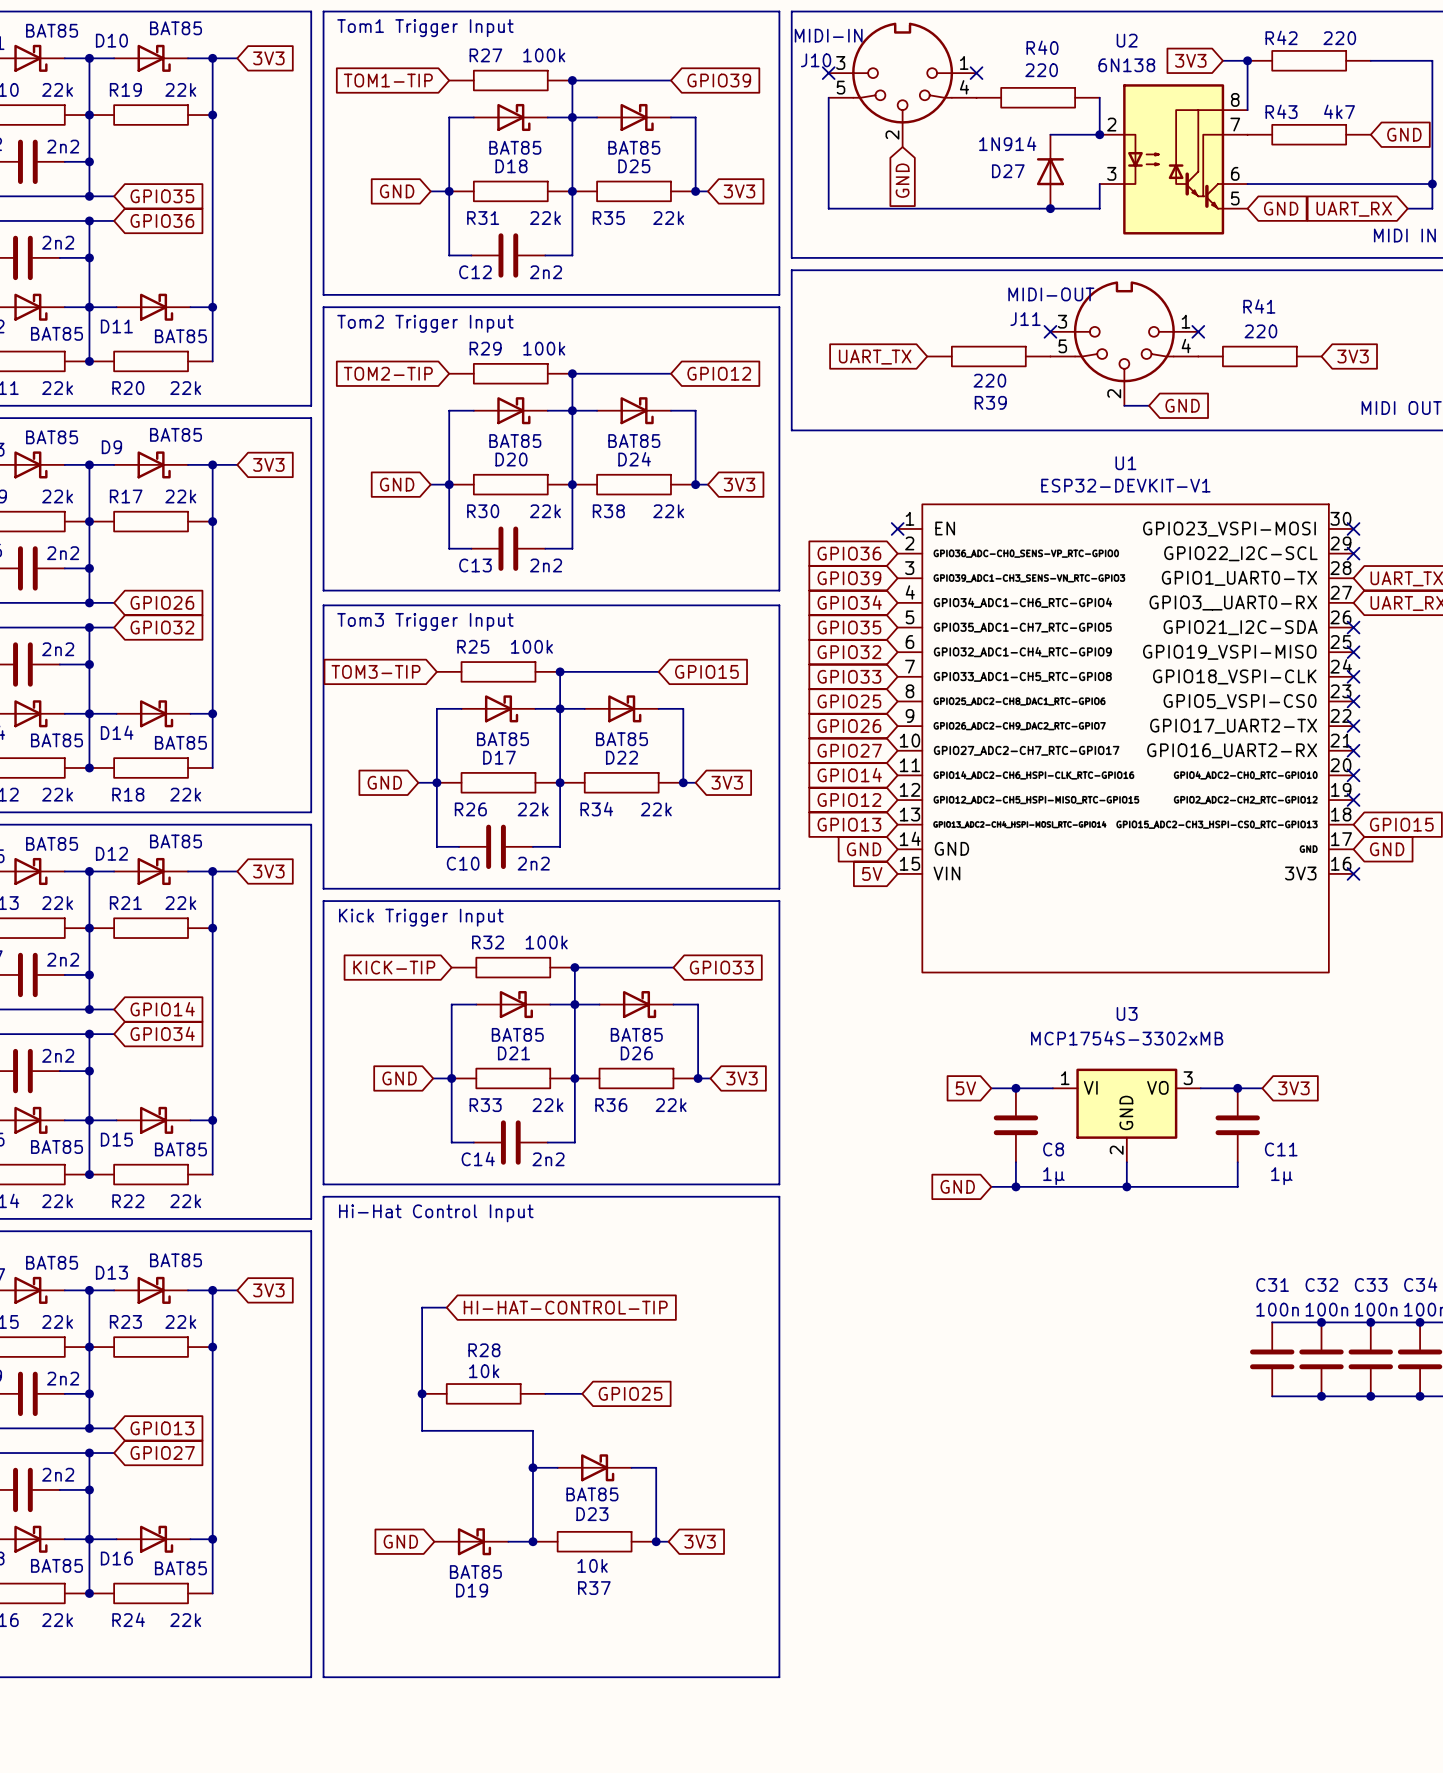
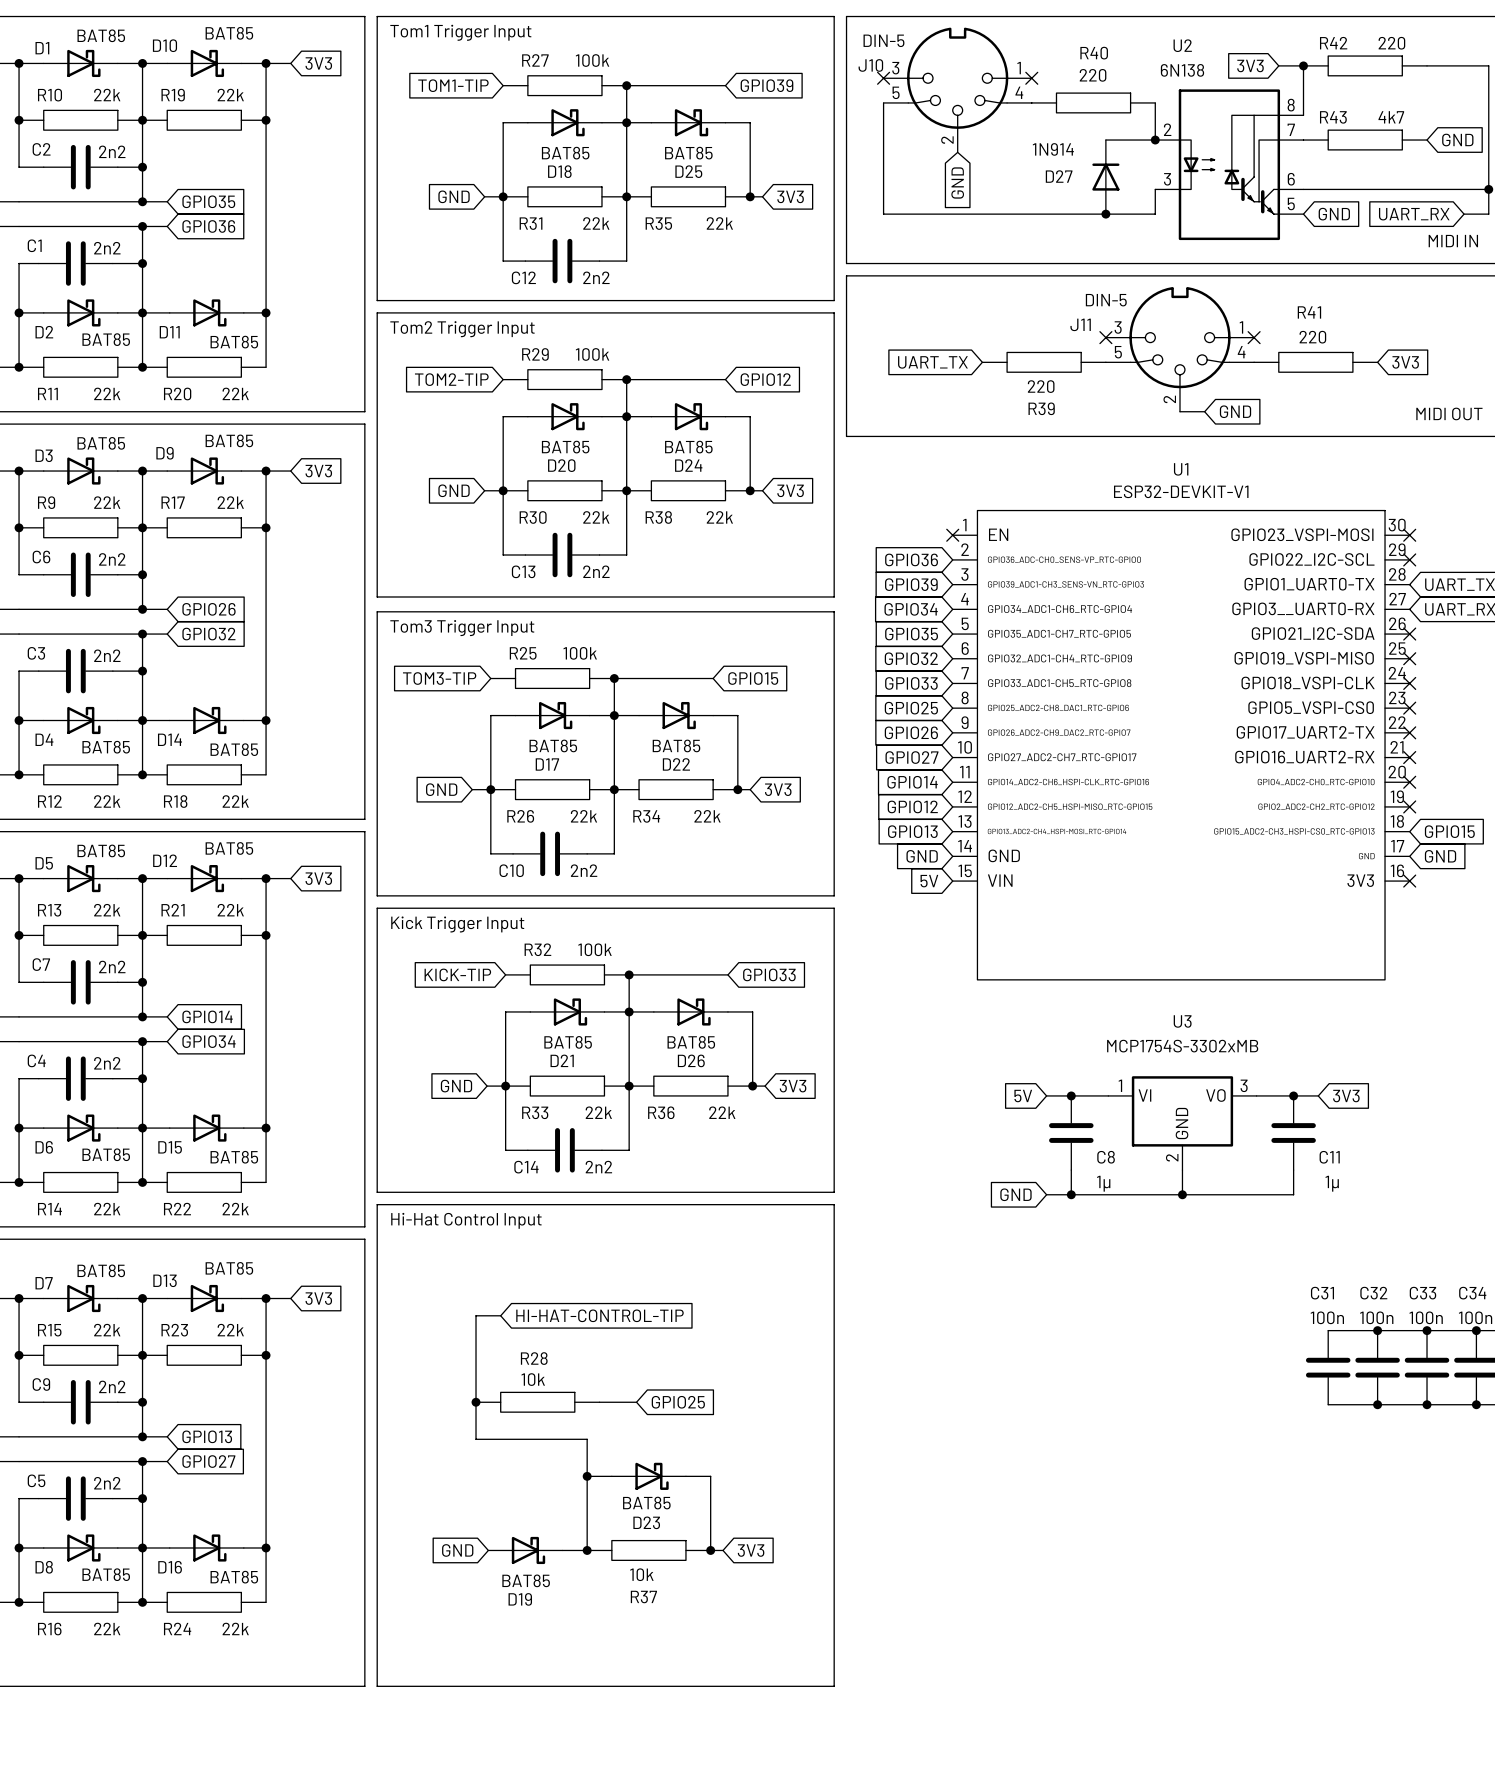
J10 value: MIDI-IN (828, 35) -> DIN-5 (883, 40)
J11 value: MIDI-OUT (1051, 294) -> DIN-5 (1106, 300)

